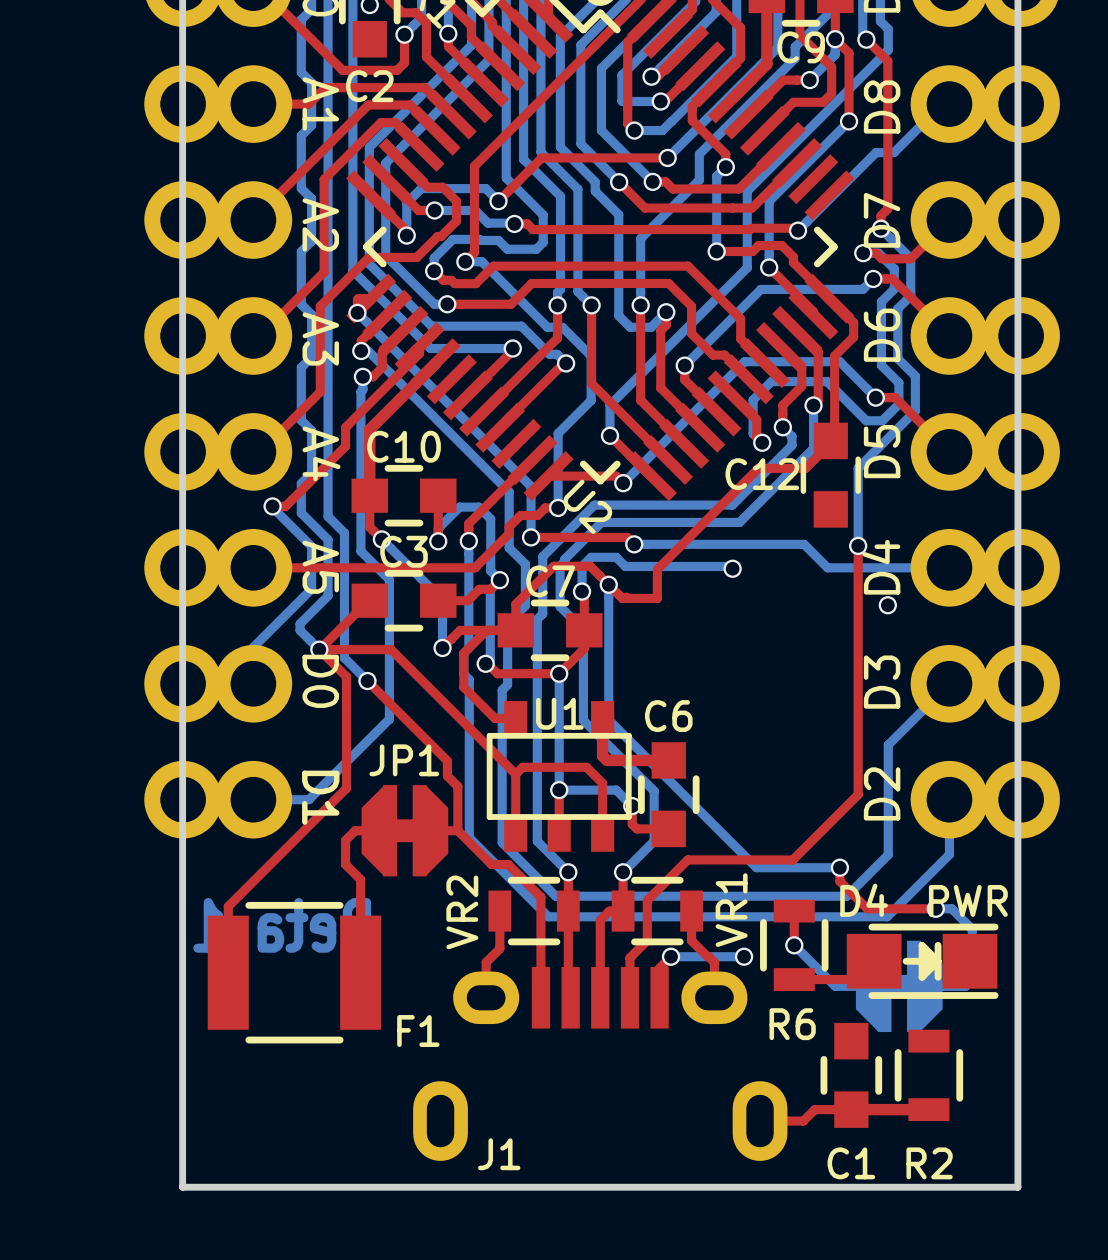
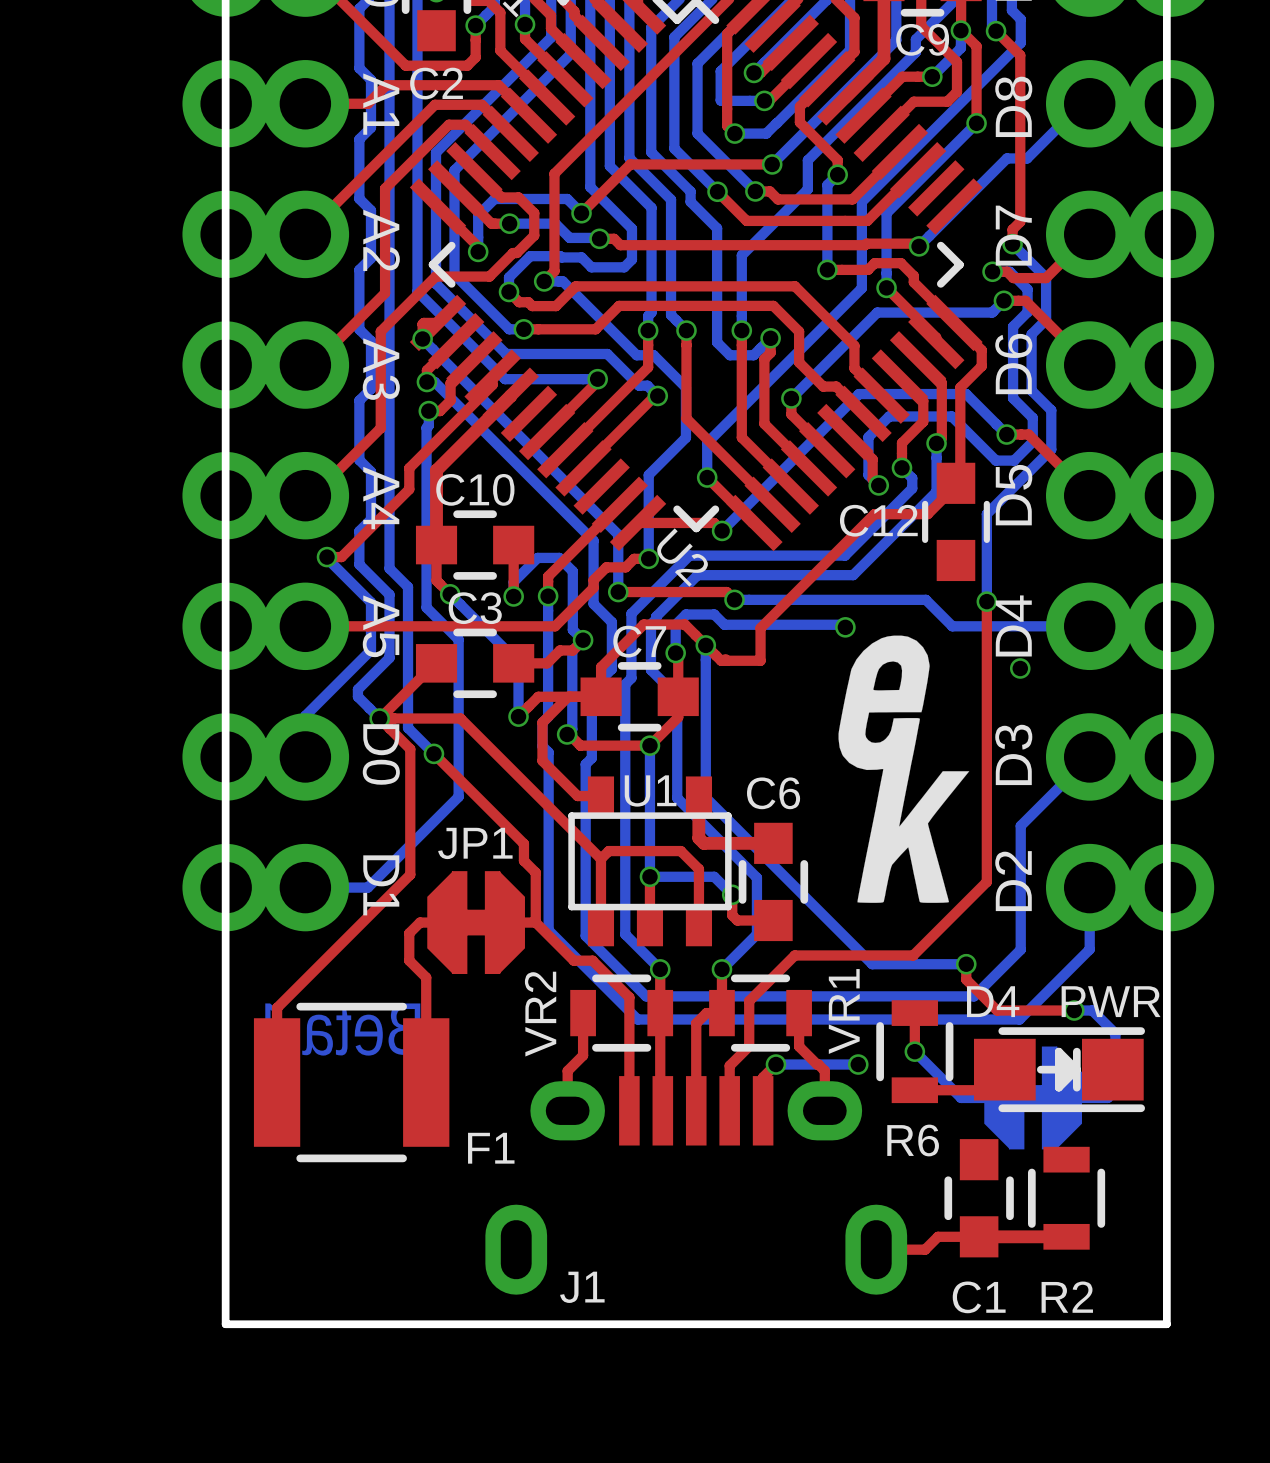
drawing: none -> [838, 635, 970, 903]

